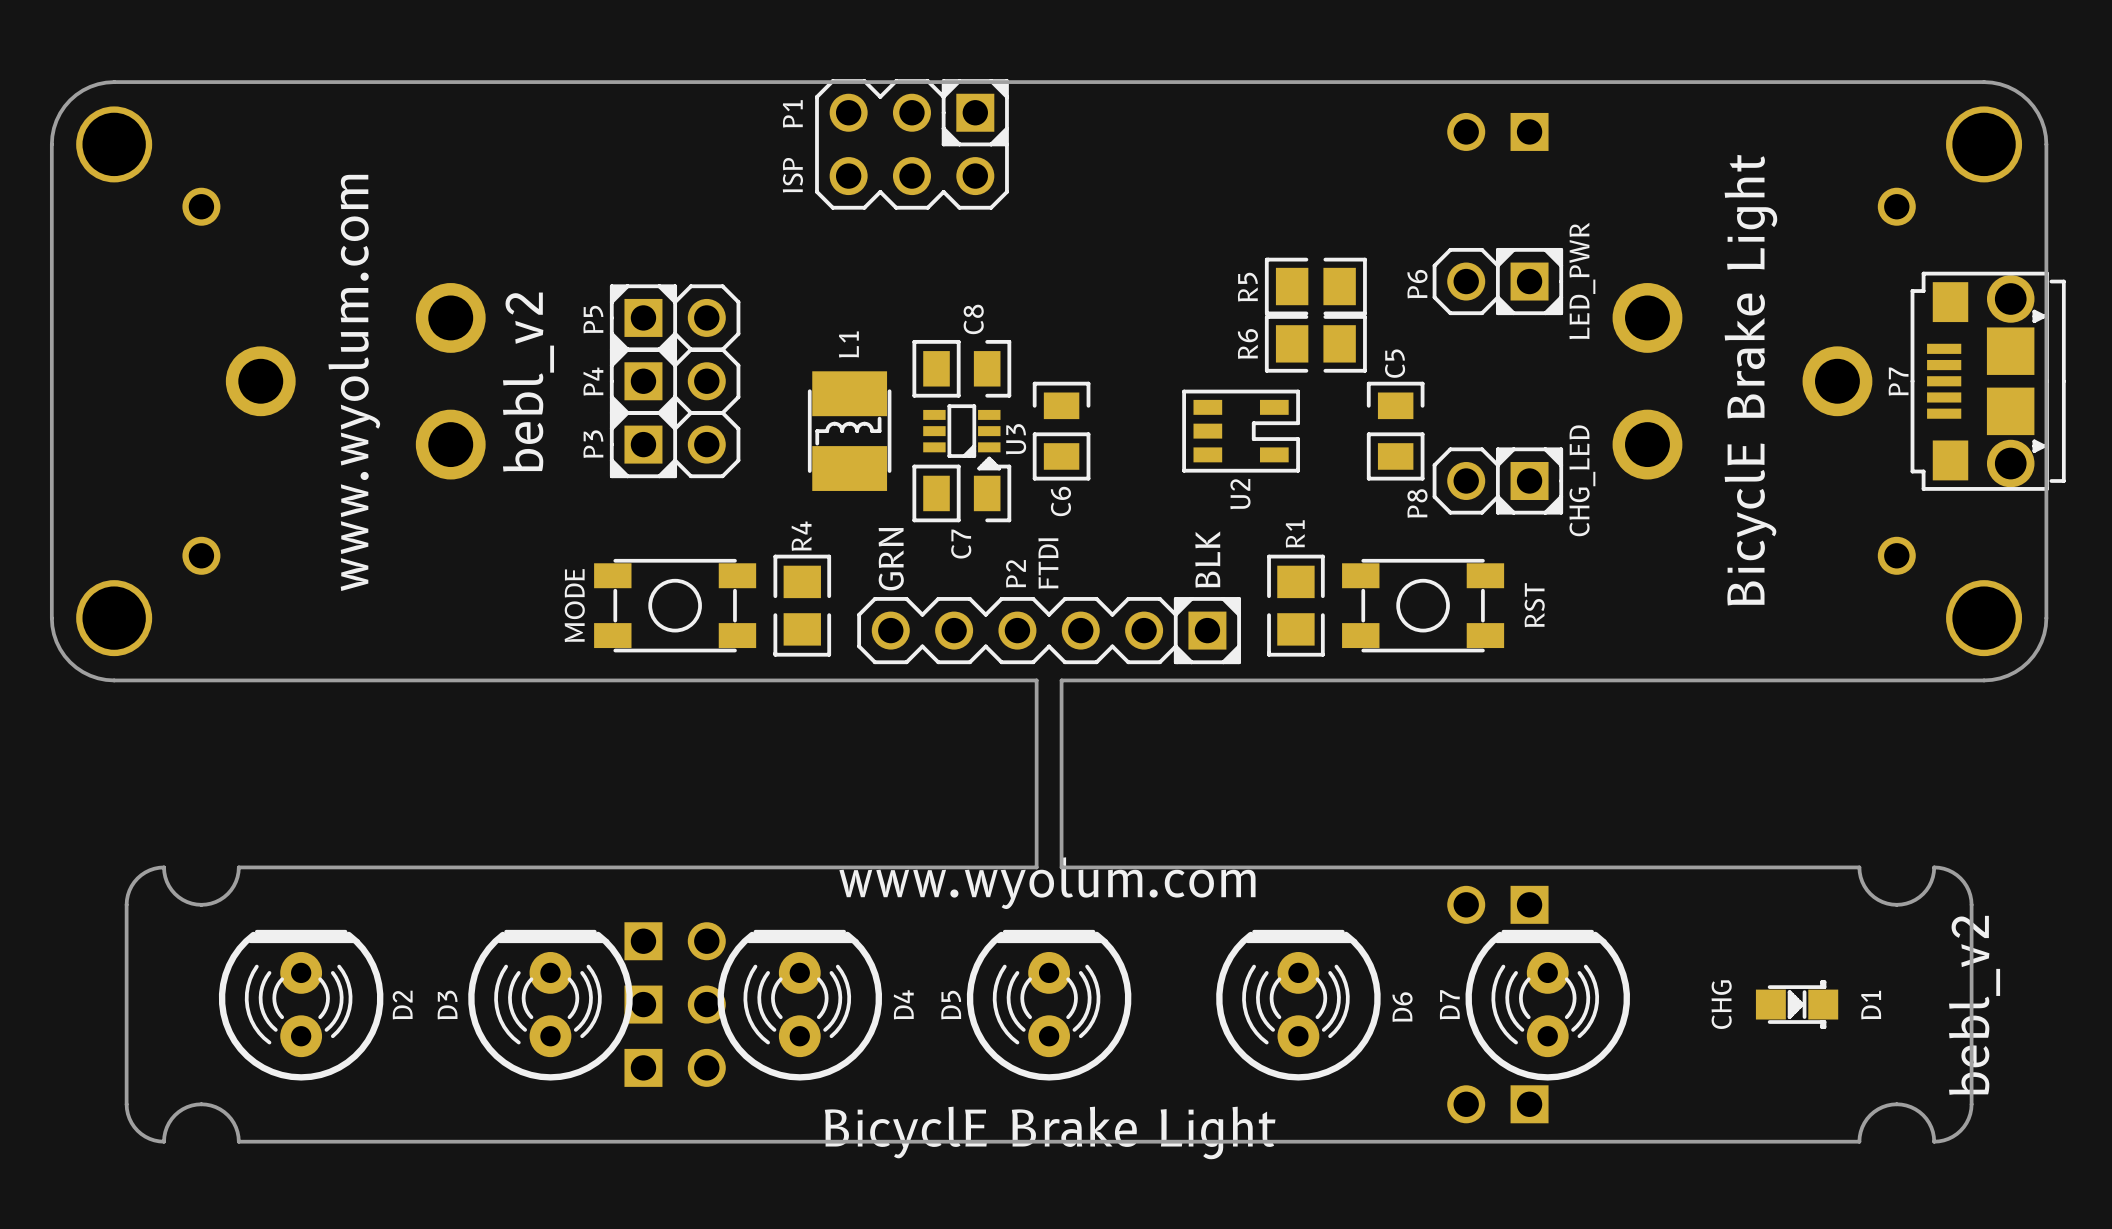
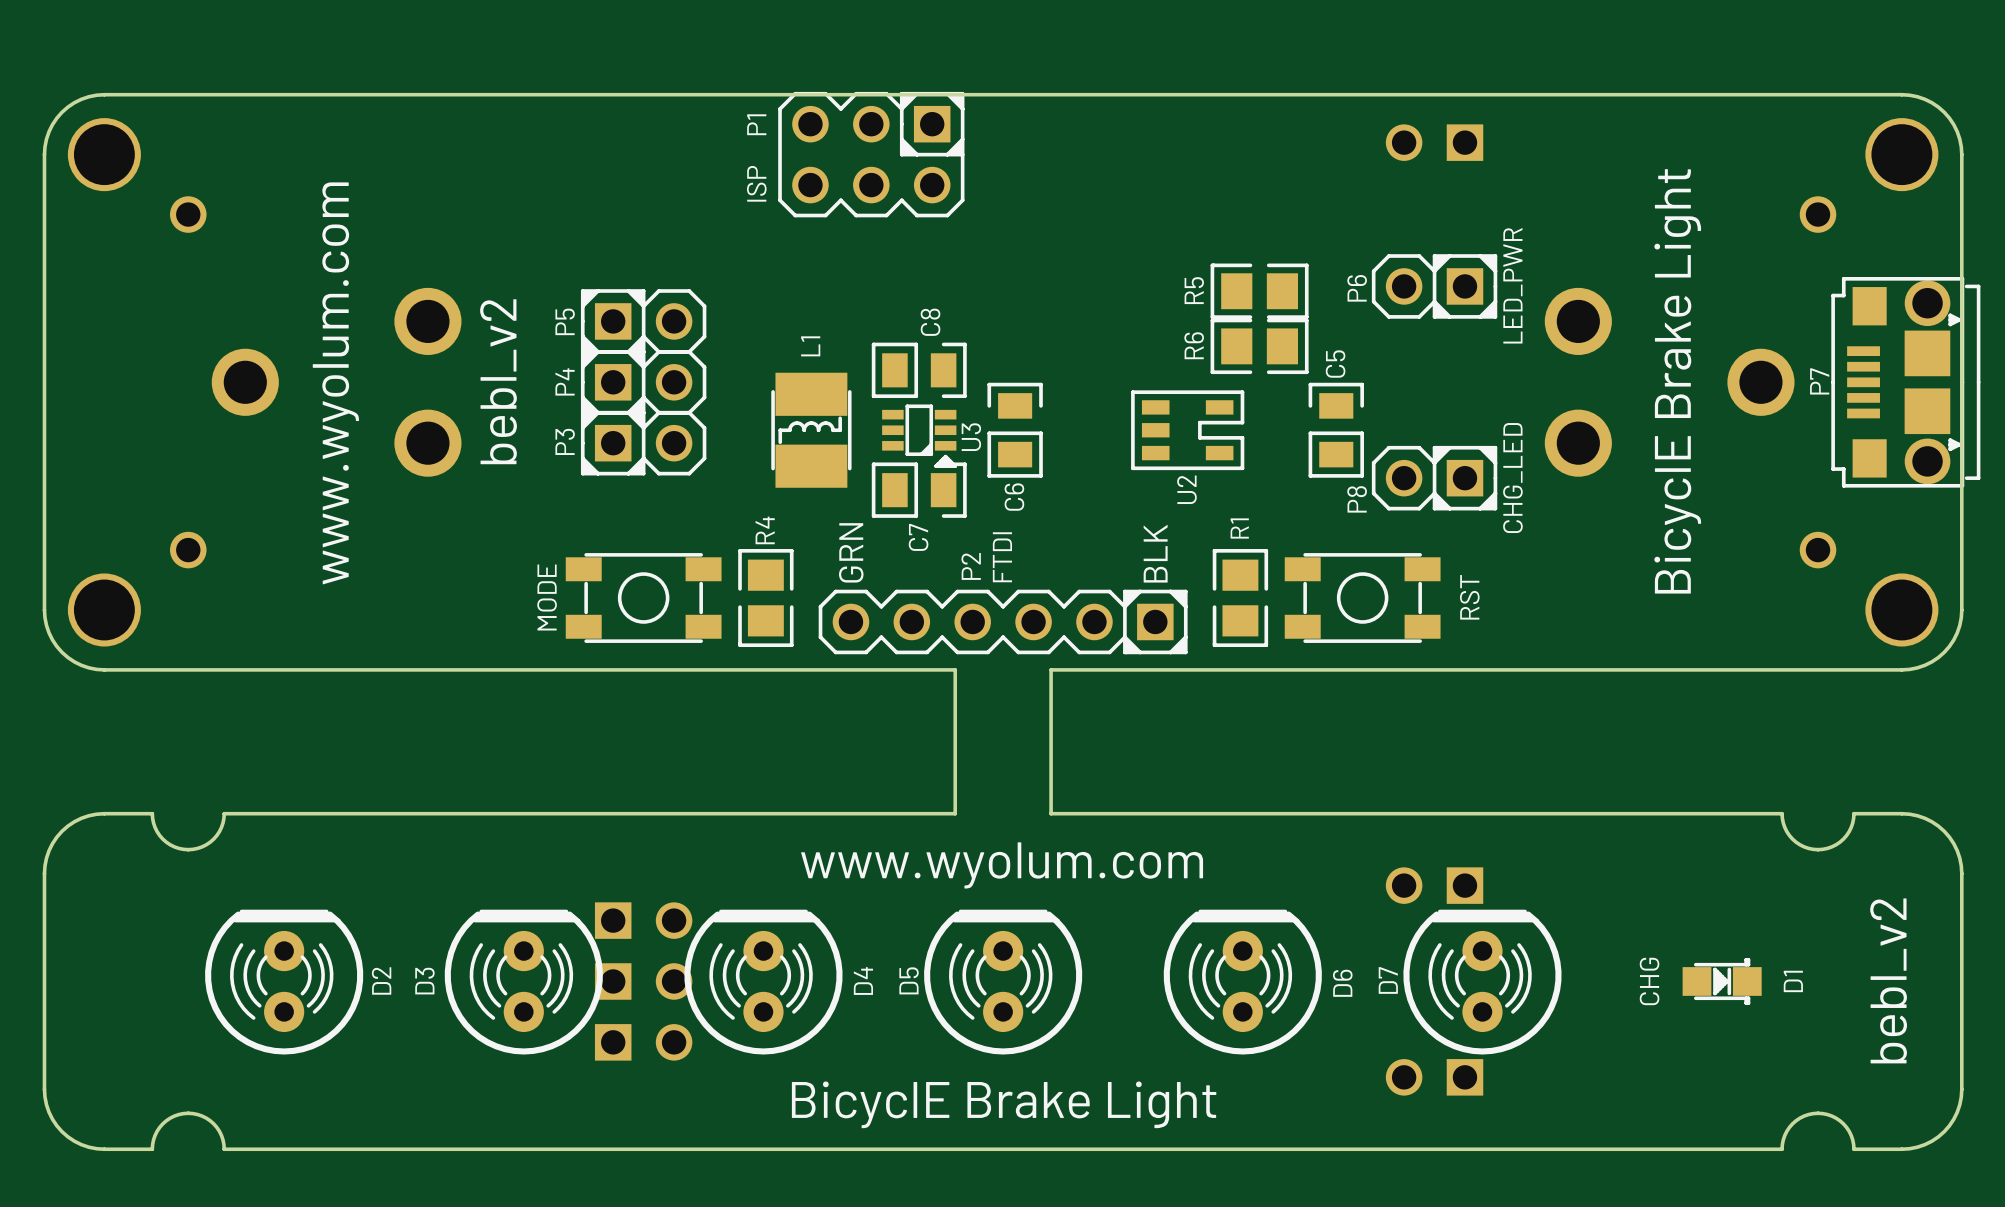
board edge: (999, 680) (1036, 680) (1036, 867) (238, 867) (235, 881) (227, 893) (215, 901) (201, 904) (187, 901) (174, 893) (166, 881) (164, 867) (145, 872) (131, 886) (126, 904) (126, 1104) (131, 1122) (145, 1136) (164, 1141) (166, 1127) (174, 1115) (187, 1107) (201, 1104) (215, 1107) (227, 1115) (235, 1127) (238, 1141) (1859, 1141) (1862, 1127) (1870, 1115) (1882, 1107) (1896, 1104) (1911, 1107) (1923, 1115) (1931, 1127) (1934, 1141) (1952, 1136) (1966, 1122) (1971, 1104) (1971, 904) (1966, 886) (1952, 872) (1934, 867) (1931, 881) (1923, 893) (1911, 901) (1896, 904) (1882, 901) (1870, 893) (1862, 881) (1859, 867) (1061, 867) (1061, 680) (1098, 680) -> (955, 669) (955, 813) (224, 813) (221, 827) (213, 839) (202, 846) (188, 849) (174, 846) (162, 839) (155, 827) (152, 813) (104, 813) (81, 818) (67, 826) (56, 837) (49, 850) (44, 865) (44, 1089) (49, 1112) (56, 1125) (67, 1136) (88, 1147) (104, 1149) (152, 1149) (155, 1135) (162, 1123) (174, 1116) (188, 1113) (202, 1116) (213, 1123) (221, 1135) (224, 1149) (1782, 1149) (1784, 1135) (1792, 1123) (1804, 1116) (1818, 1113) (1831, 1116) (1843, 1123) (1851, 1135) (1853, 1149) (1901, 1149) (1917, 1147) (1938, 1136) (1949, 1125) (1957, 1112) (1961, 1089) (1961, 865) (1957, 850) (1949, 837) (1938, 826) (1924, 818) (1901, 813) (1853, 813) (1851, 827) (1843, 839) (1831, 846) (1818, 849) (1804, 846) (1792, 839) (1784, 827) (1782, 813) (1051, 813) (1051, 669)

